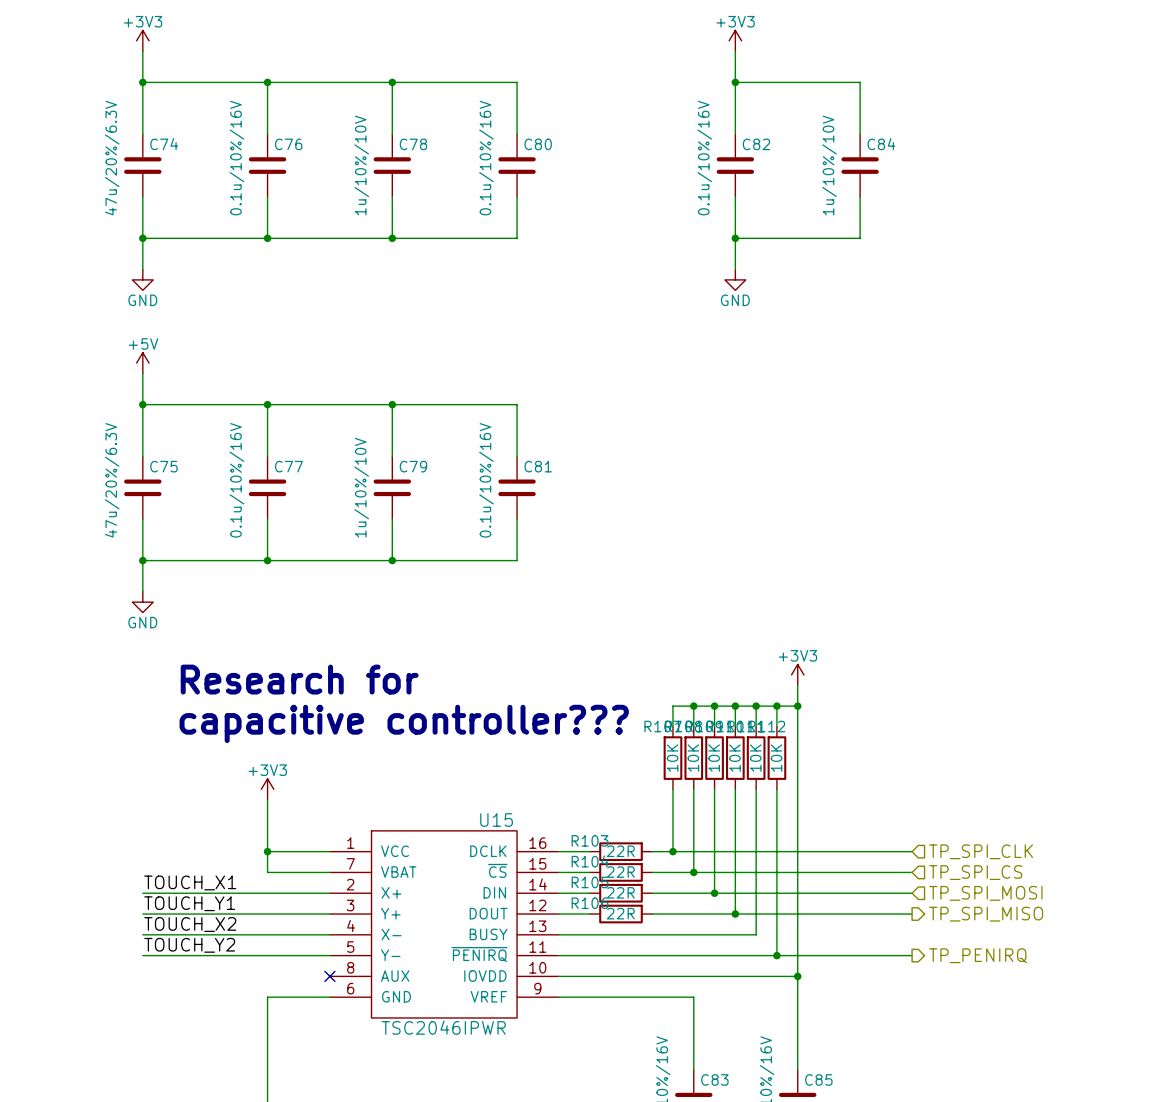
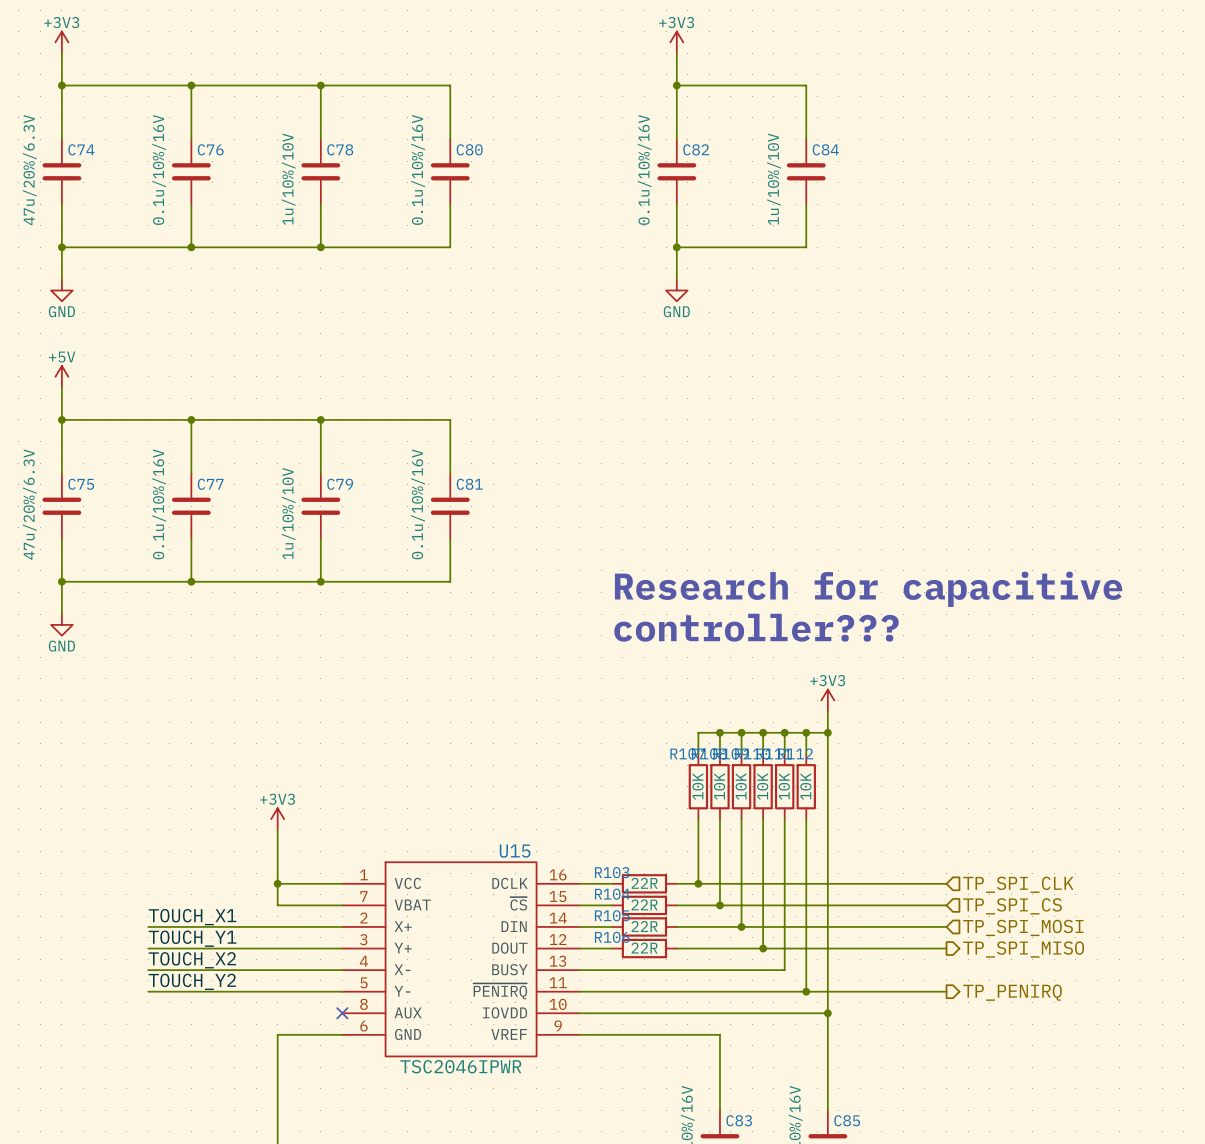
power symbol position: +3V3 (142, 40) -> +3V3 (61, 42)
power symbol position: +3V3 (735, 40) -> +3V3 (676, 42)
wire: (142, 51) (142, 134) -> (61, 53) (61, 139)
wire: (735, 51) (735, 134) -> (676, 53) (676, 139)
wire: none -> (61, 85) (148, 85)
junction: none -> (61, 85)
junction: (142, 82) -> none
junction: none -> (191, 85)
wire: (267, 82) (267, 134) -> (191, 85) (191, 139)
junction: (267, 82) -> none
junction: none -> (320, 85)
wire: (392, 82) (392, 134) -> (320, 85) (320, 139)
junction: (392, 82) -> none
wire: (433, 82) (517, 82) (517, 134) -> (450, 85) (450, 139)
wire: none -> (676, 85) (763, 85)
junction: none -> (676, 85)
junction: (735, 82) -> none
wire: (776, 82) (860, 82) (860, 134) -> (806, 85) (806, 139)
C74 position: (142, 165) -> (61, 171)
C76 position: (267, 165) -> (191, 171)
C78 position: (392, 165) -> (320, 171)
C80 position: (517, 165) -> (450, 171)
C82 position: (735, 165) -> (676, 171)
C84 position: (860, 165) -> (806, 171)
wire: (142, 196) (142, 269) -> (61, 204) (61, 279)
wire: (267, 196) (267, 238) -> (191, 204) (191, 247)
wire: (392, 196) (392, 238) -> (320, 204) (320, 247)
wire: (517, 196) (517, 238) (433, 238) -> (450, 204) (450, 247)
wire: (735, 196) (735, 269) -> (676, 204) (676, 279)
wire: (860, 196) (860, 238) (776, 238) -> (806, 204) (806, 247)
wire: none -> (61, 247) (148, 247)
junction: none -> (61, 247)
junction: (142, 238) -> none
junction: none -> (191, 247)
junction: (267, 238) -> none
junction: none -> (320, 247)
junction: (392, 238) -> none
wire: none -> (676, 247) (763, 247)
junction: none -> (676, 247)
junction: (735, 238) -> none
power symbol position: GND (142, 279) -> GND (61, 290)
power symbol position: GND (735, 279) -> GND (676, 290)
power symbol position: +5V (142, 363) -> +5V (61, 376)
wire: (142, 373) (142, 456) -> (61, 387) (61, 473)
wire: none -> (61, 419) (148, 419)
junction: none -> (61, 419)
junction: (142, 404) -> none
junction: none -> (191, 419)
wire: (267, 404) (267, 456) -> (191, 419) (191, 473)
junction: (267, 404) -> none
junction: none -> (320, 419)
wire: (392, 404) (392, 456) -> (320, 419) (320, 473)
junction: (392, 404) -> none
wire: (433, 404) (517, 404) (517, 456) -> (450, 419) (450, 473)
C75 position: (142, 487) -> (61, 506)
C77 position: (267, 487) -> (191, 506)
C79 position: (392, 487) -> (320, 506)
C81 position: (517, 487) -> (450, 506)
wire: (142, 519) (142, 591) -> (61, 538) (61, 614)
wire: (267, 519) (267, 560) -> (191, 538) (191, 581)
wire: (392, 519) (392, 560) -> (320, 538) (320, 581)
wire: (517, 519) (517, 560) (433, 560) -> (450, 538) (450, 581)
wire: none -> (61, 581) (148, 581)
junction: none -> (61, 581)
junction: (142, 560) -> none
junction: none -> (191, 581)
junction: (267, 560) -> none
junction: none -> (320, 581)
junction: (392, 560) -> none
text: none -> Research for capacitive (868, 589)
power symbol position: GND (142, 602) -> GND (61, 624)
text: none -> controller??? (756, 627)
text: Research for (299, 679) -> none
text: capacitive controller??? (404, 723) -> none

